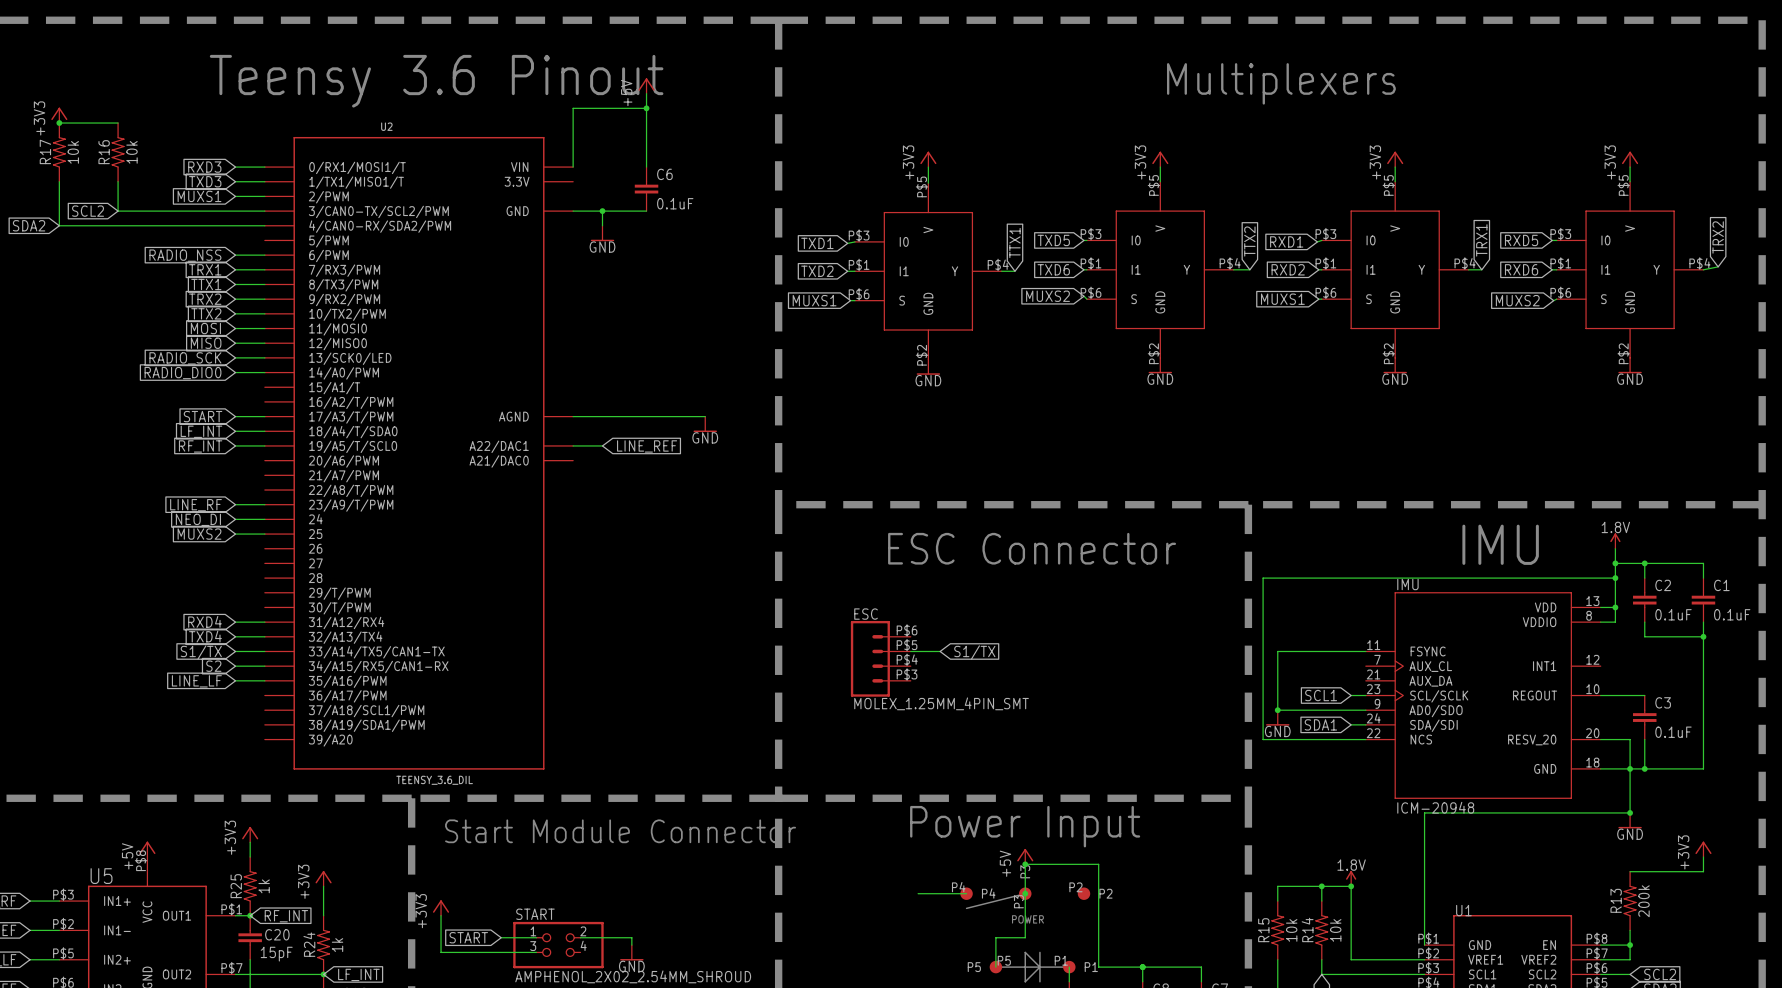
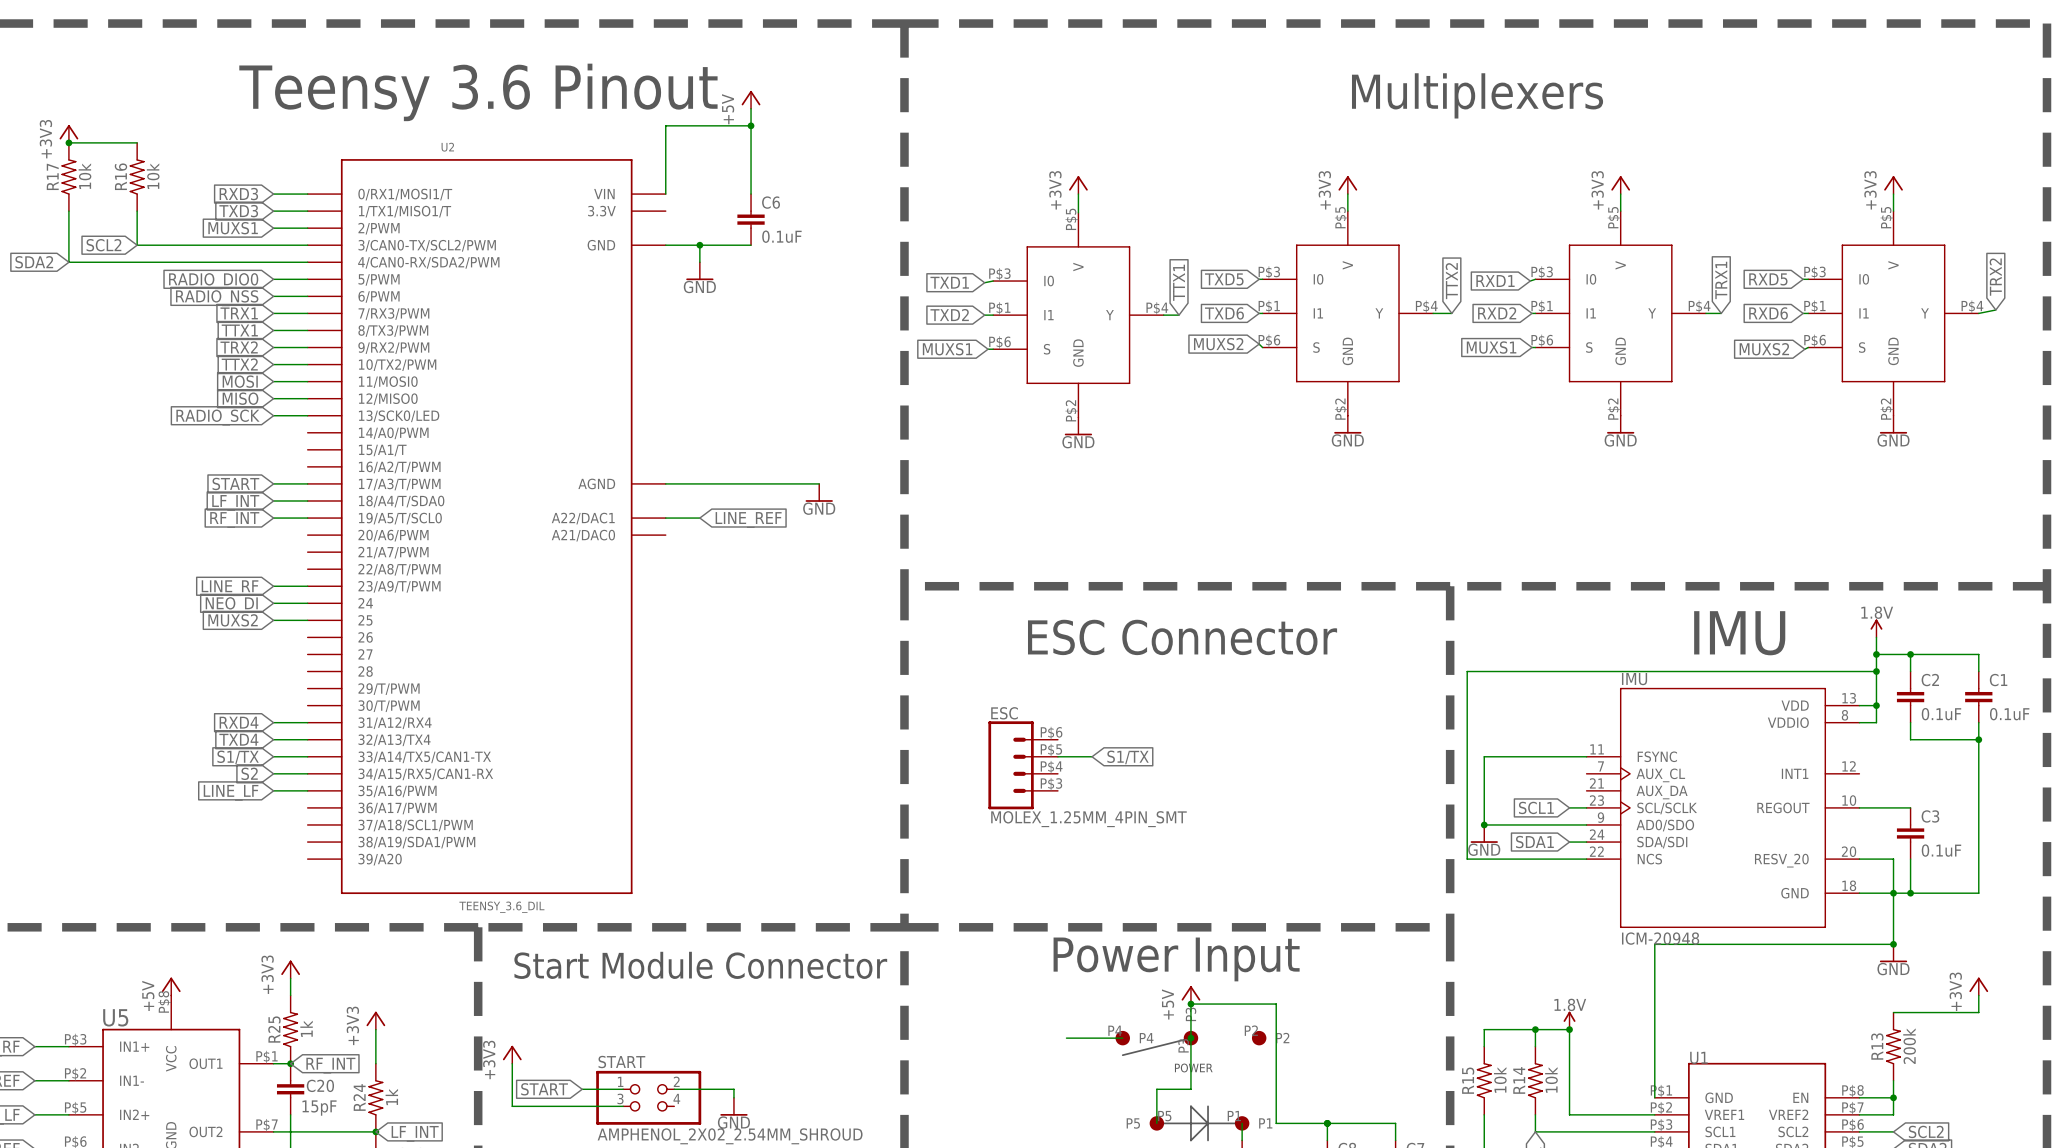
wire: (235, 372) (264, 372) -> (273, 279) (307, 279)
global label position: RADIO_DIO0 (182, 373) -> RADIO_DIO0 (213, 281)

